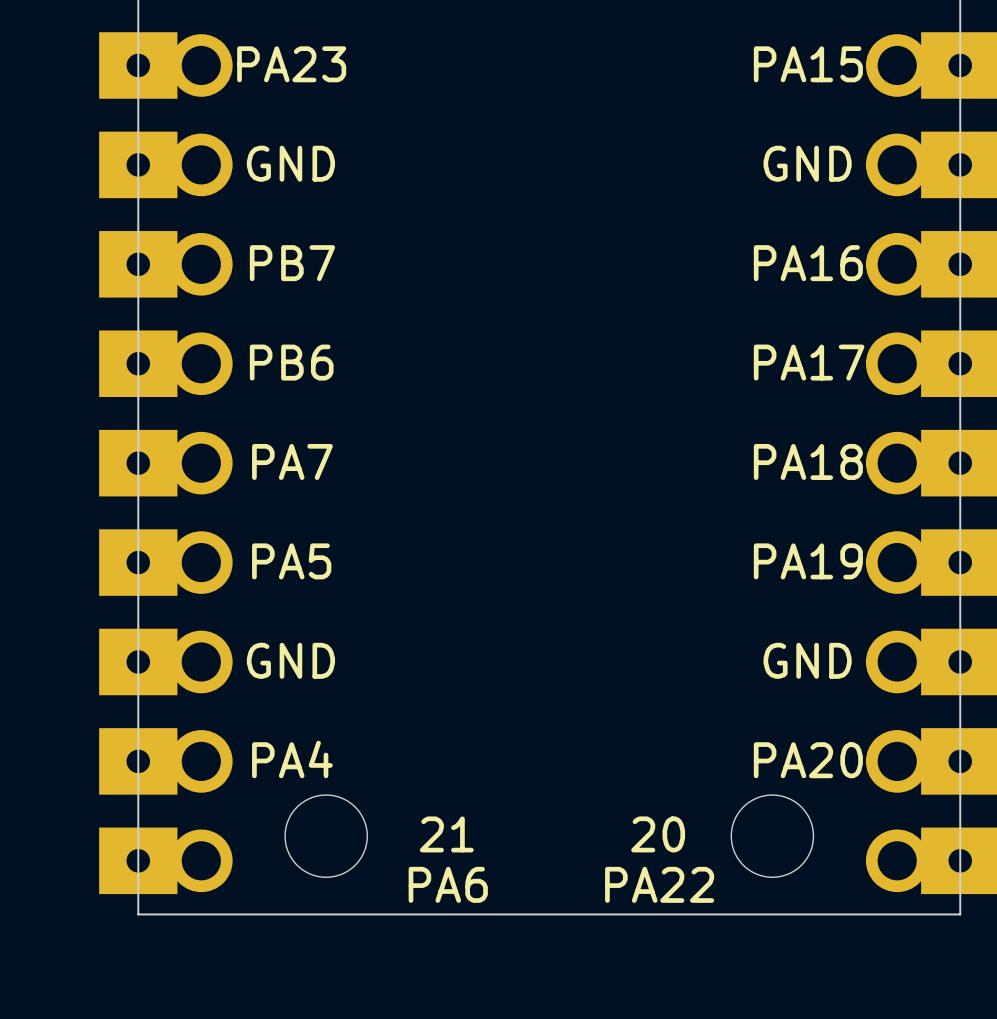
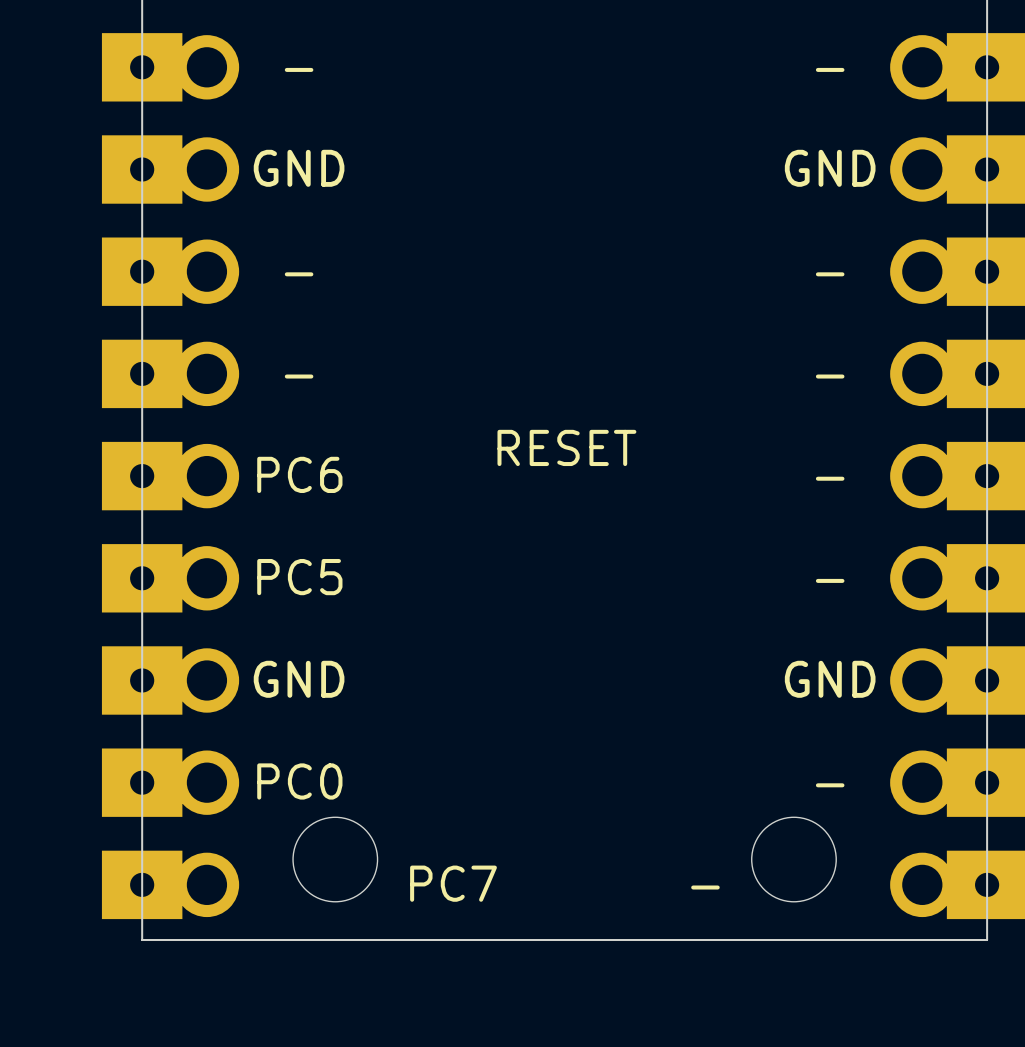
text: PA23 (291, 64) -> - (299, 69)
text: PA15 (808, 64) -> - (830, 69)
text: PB7 (292, 263) -> - (299, 274)
text: PA16 (808, 263) -> - (830, 274)
text: PB6 (291, 362) -> - (299, 376)
text: PA17 (809, 362) -> - (830, 376)
text: none -> RESET (566, 447)
text: PA7 (292, 461) -> PC6 (299, 474)
text: PA18 (808, 461) -> - (830, 478)
text: PA5 (291, 561) -> PC5 (299, 577)
text: PA19 (808, 561) -> - (830, 580)
text: PA4 (292, 759) -> PC0 (299, 781)
text: PA20 (808, 760) -> - (830, 785)
text: 21 (446, 834) -> none
text: 20 (658, 834) -> none
text: none -> PC7 (453, 883)
text: none -> - (705, 887)
text: PA6 (448, 884) -> none
text: PA22 (659, 884) -> none

